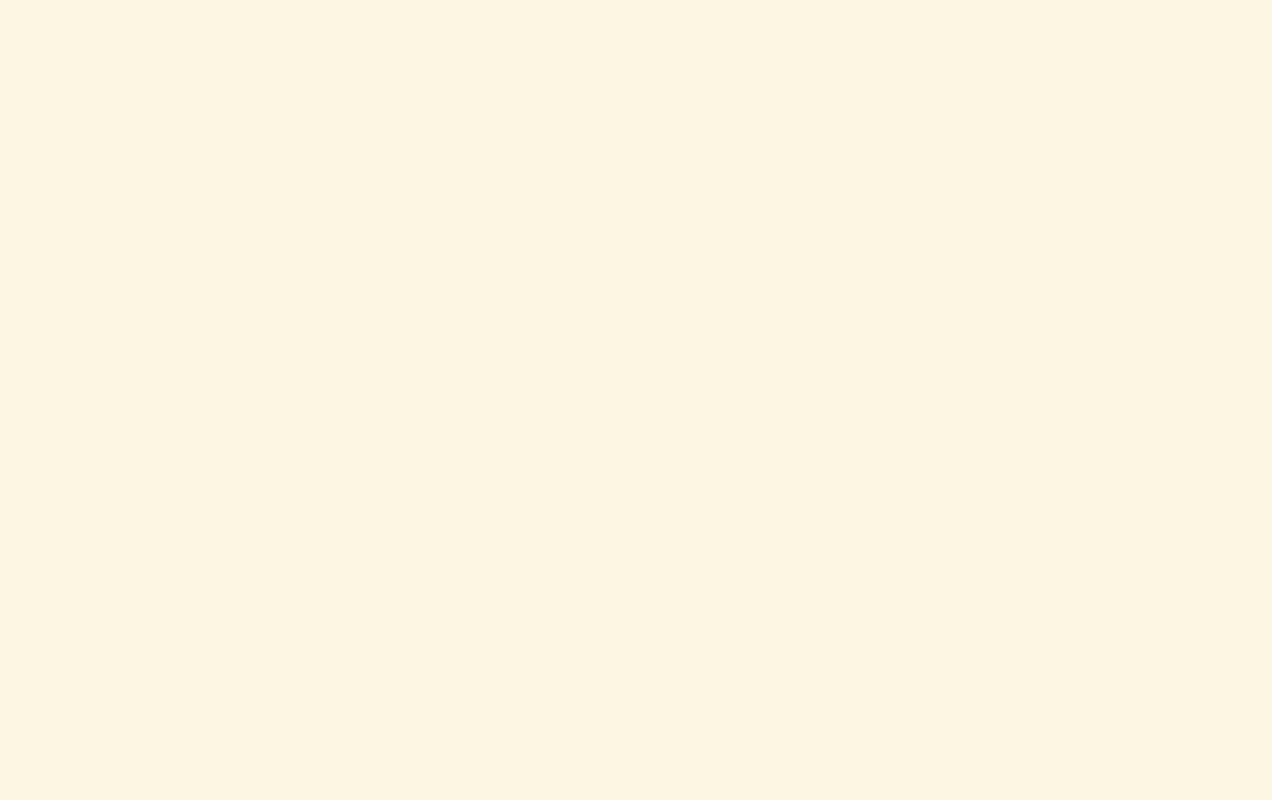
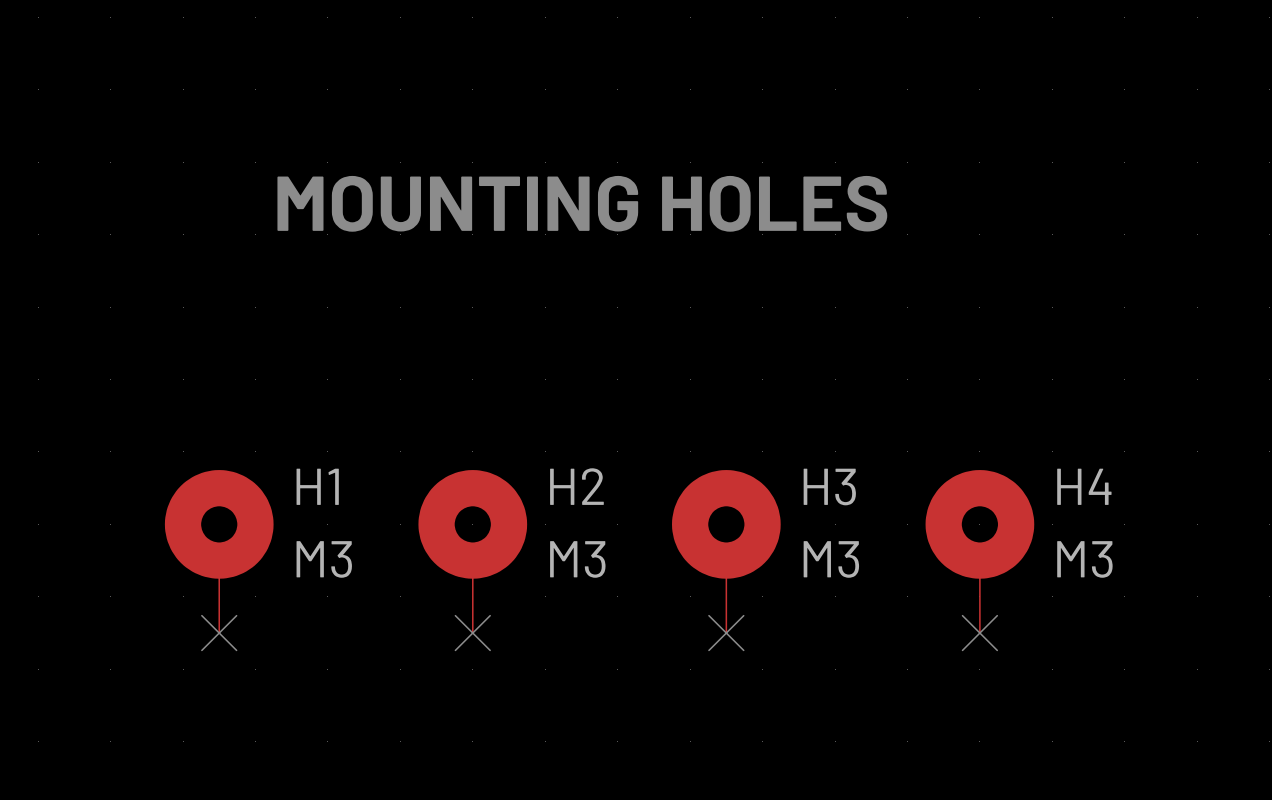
text: none -> MOUNTING HOLES (582, 203)
H1: none -> M3 (219, 551)
H2: none -> M3 (472, 551)
H3: none -> M3 (726, 551)
H4: none -> M3 (979, 551)
no-connect mark: none -> (219, 633)
no-connect mark: none -> (472, 633)
no-connect mark: none -> (726, 633)
no-connect mark: none -> (979, 633)

